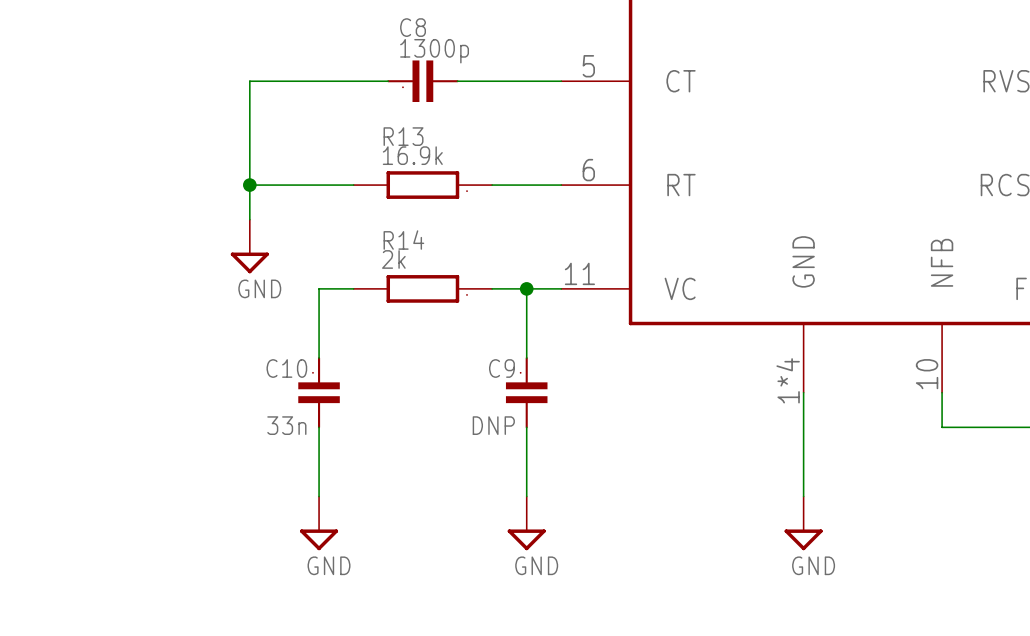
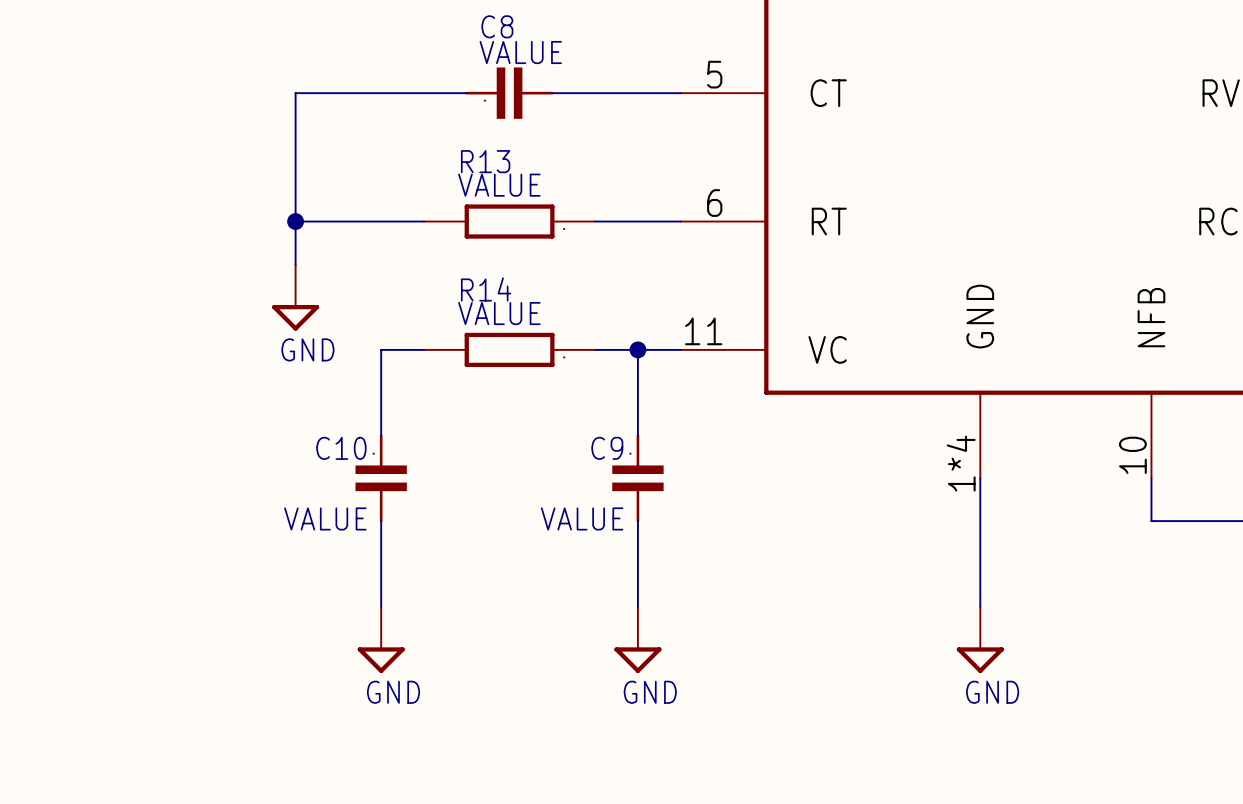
C8 value: 1300p (434, 51) -> VALUE (520, 52)
R13 value: 16.9k (412, 155) -> VALUE (499, 185)
R14 value: 2k (393, 259) -> VALUE (499, 313)
C10 value: 33n (286, 425) -> VALUE (325, 518)
C9 value: DNP (493, 425) -> VALUE (582, 518)

